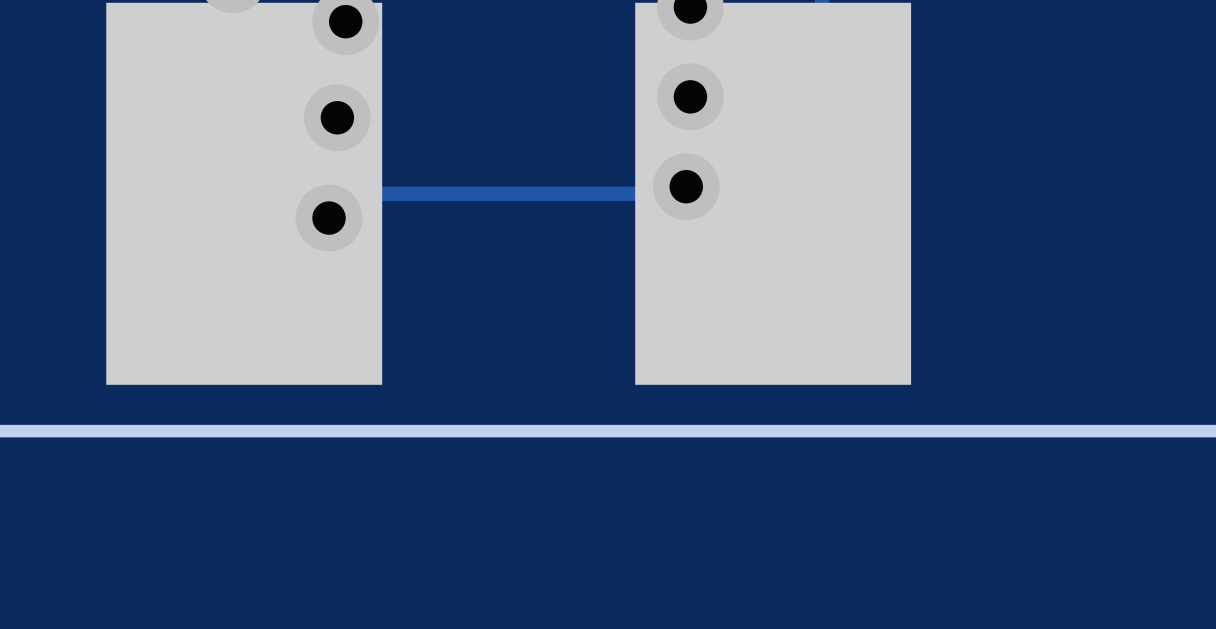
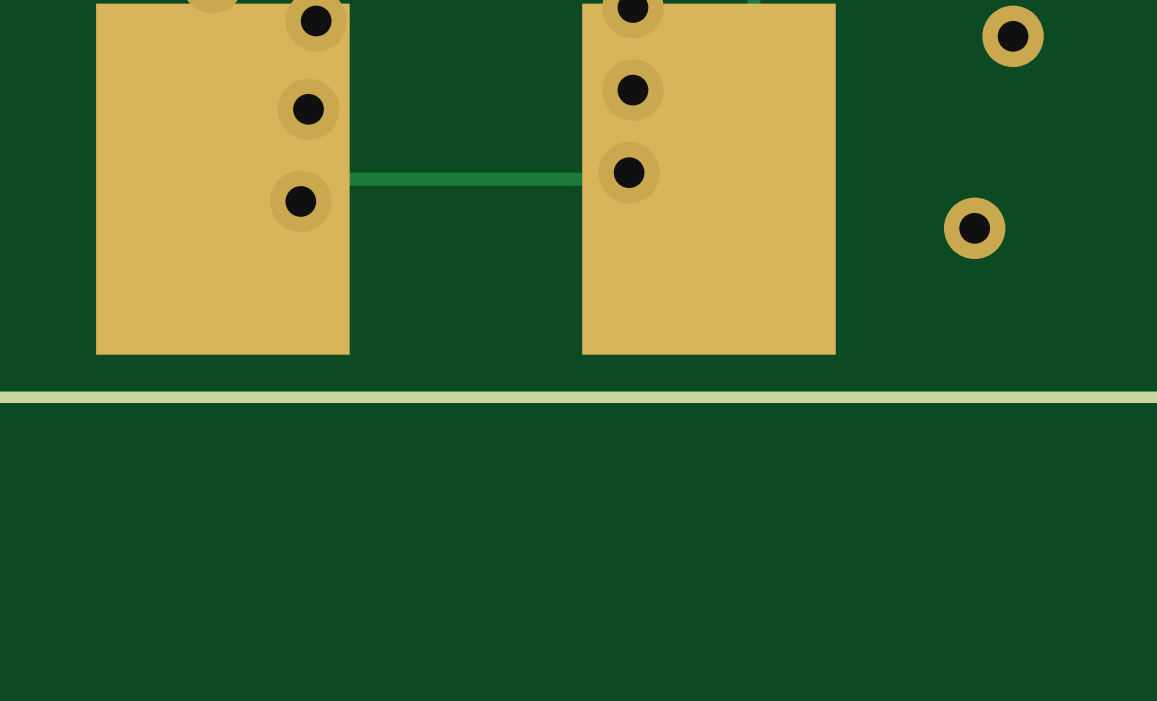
via: none -> (1013, 36)
via: none -> (974, 228)

